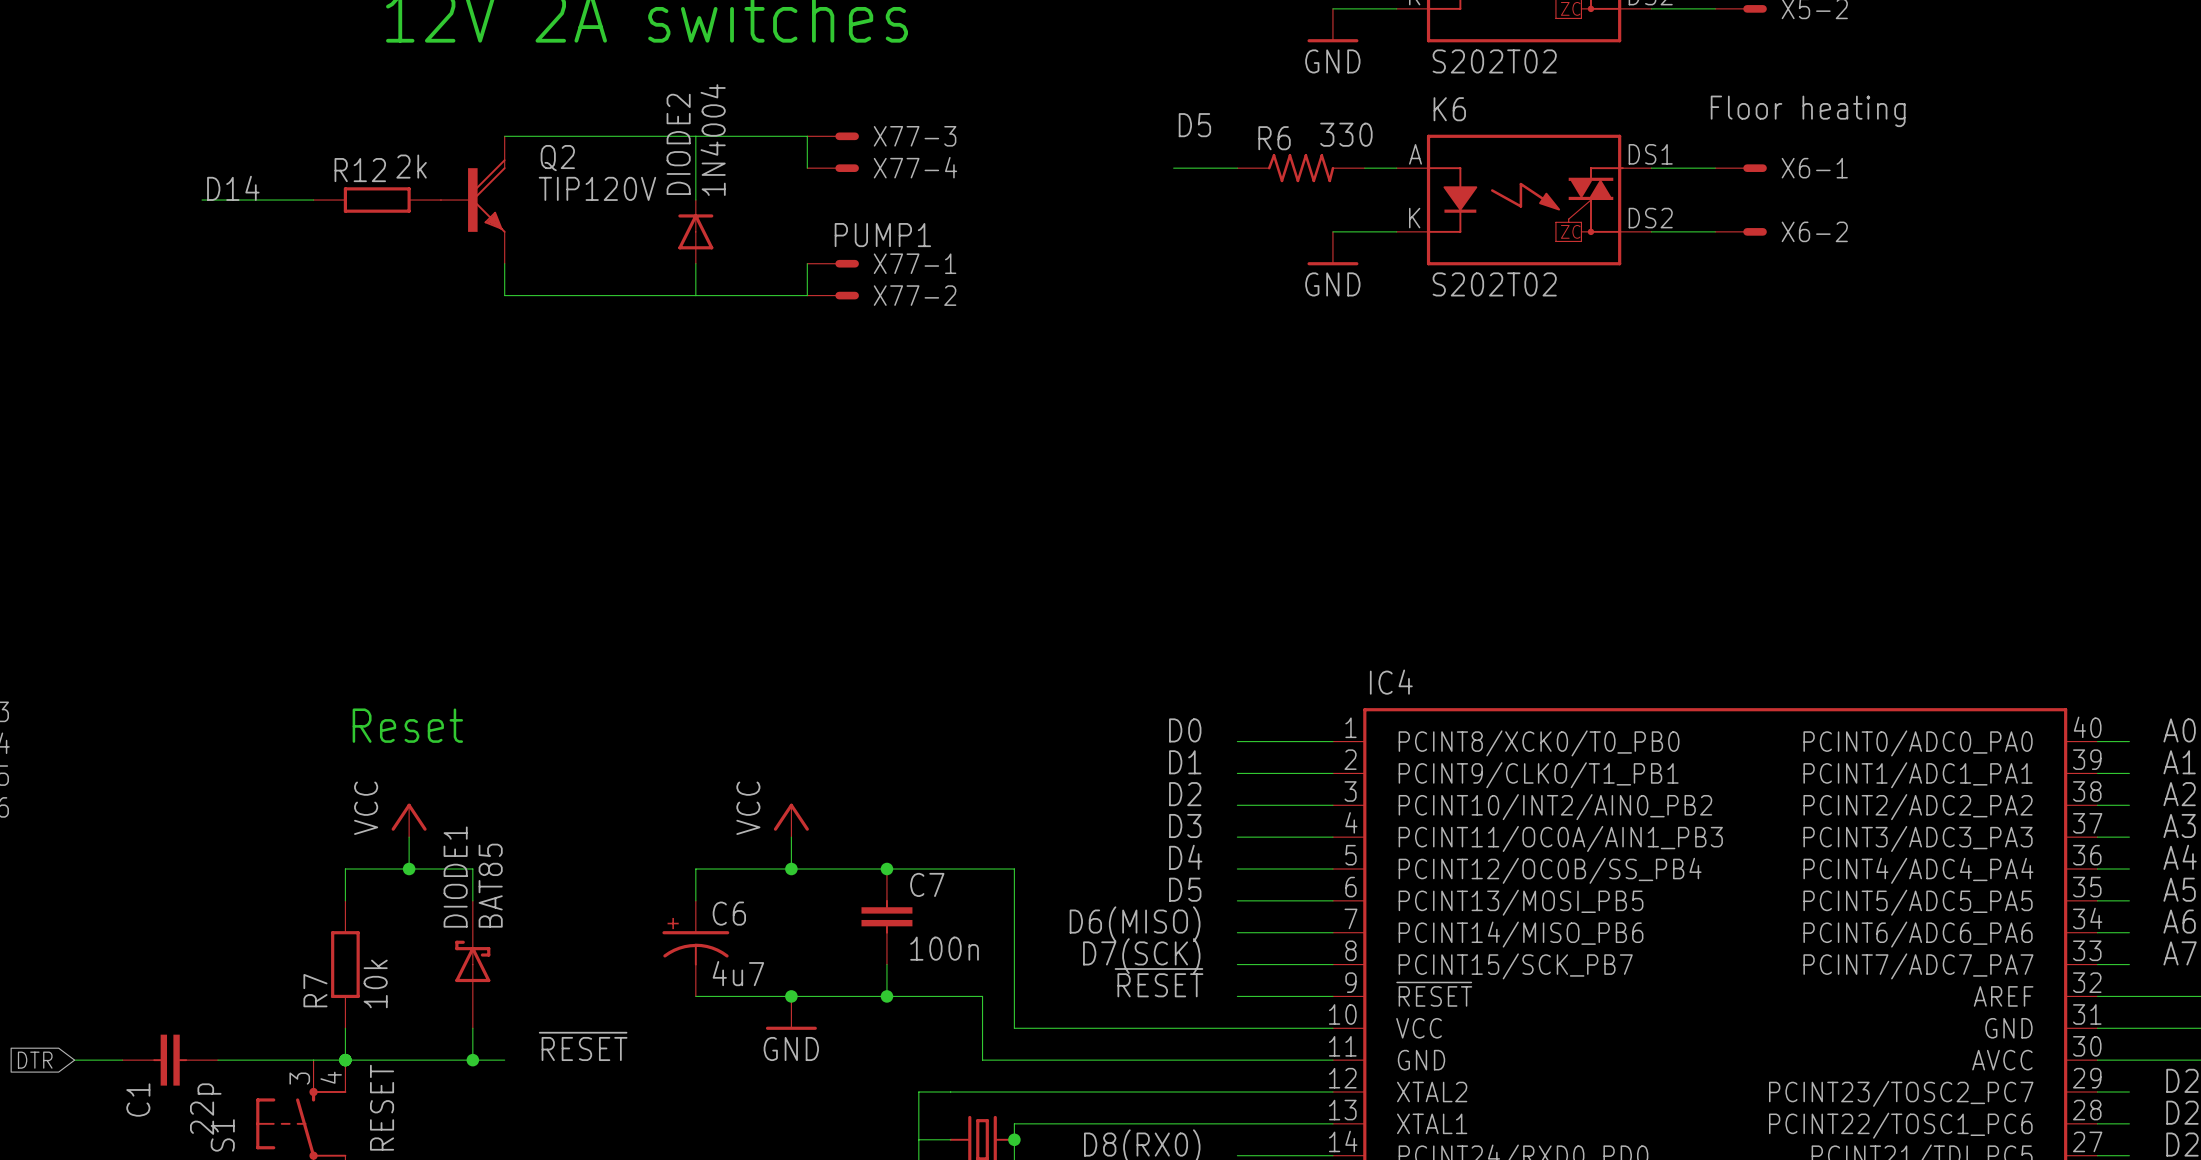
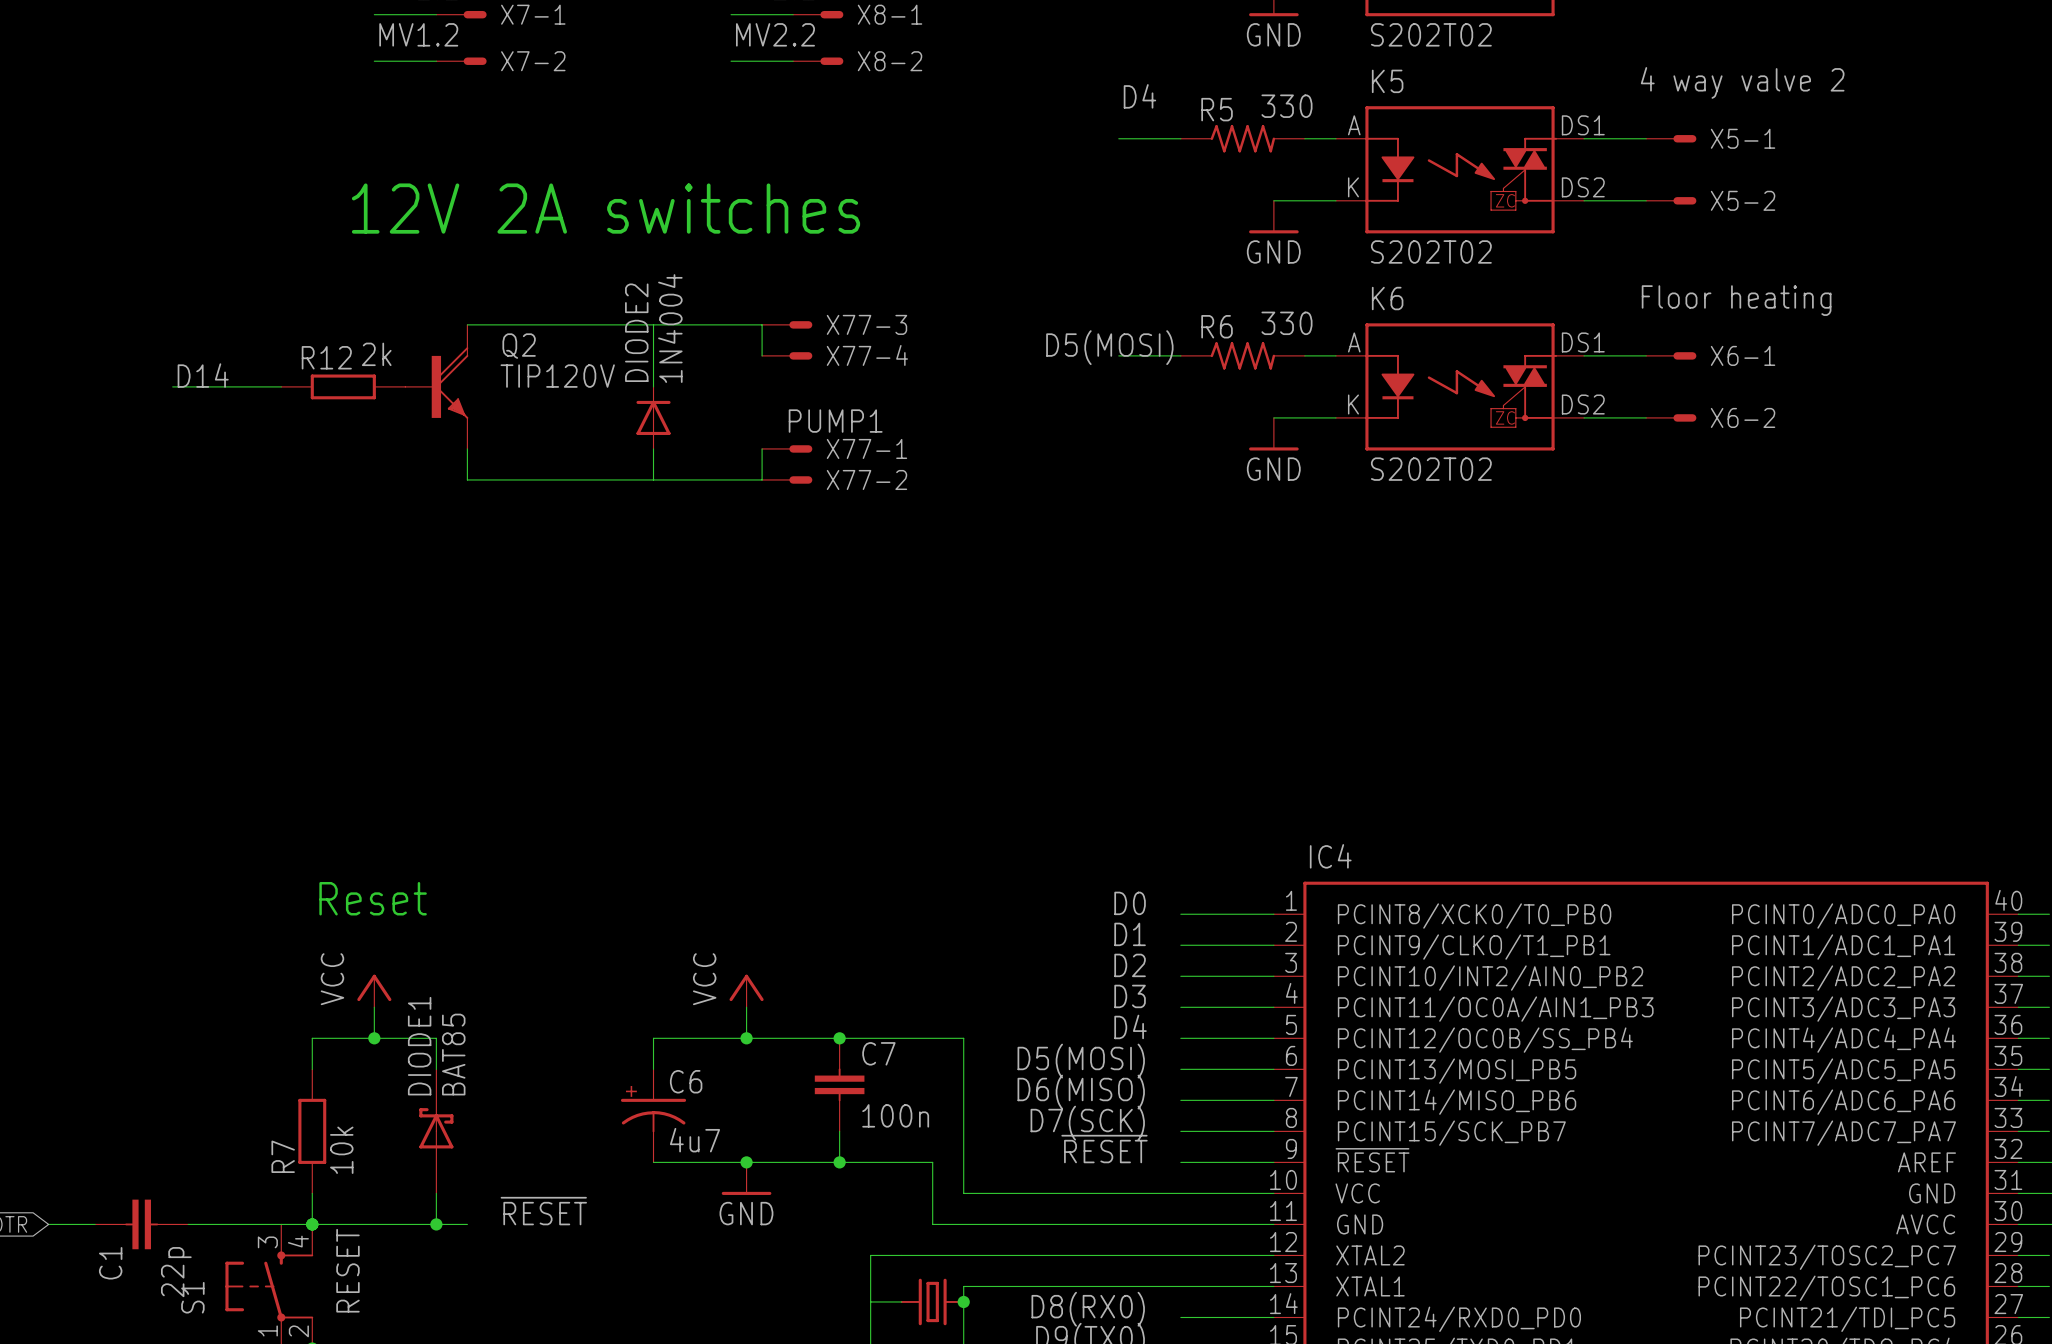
label: D5 (1194, 125) -> none
label: none -> D5(MOSI) (1109, 347)
label: D5 (1185, 889) -> D5(MOSI) (1081, 1061)

